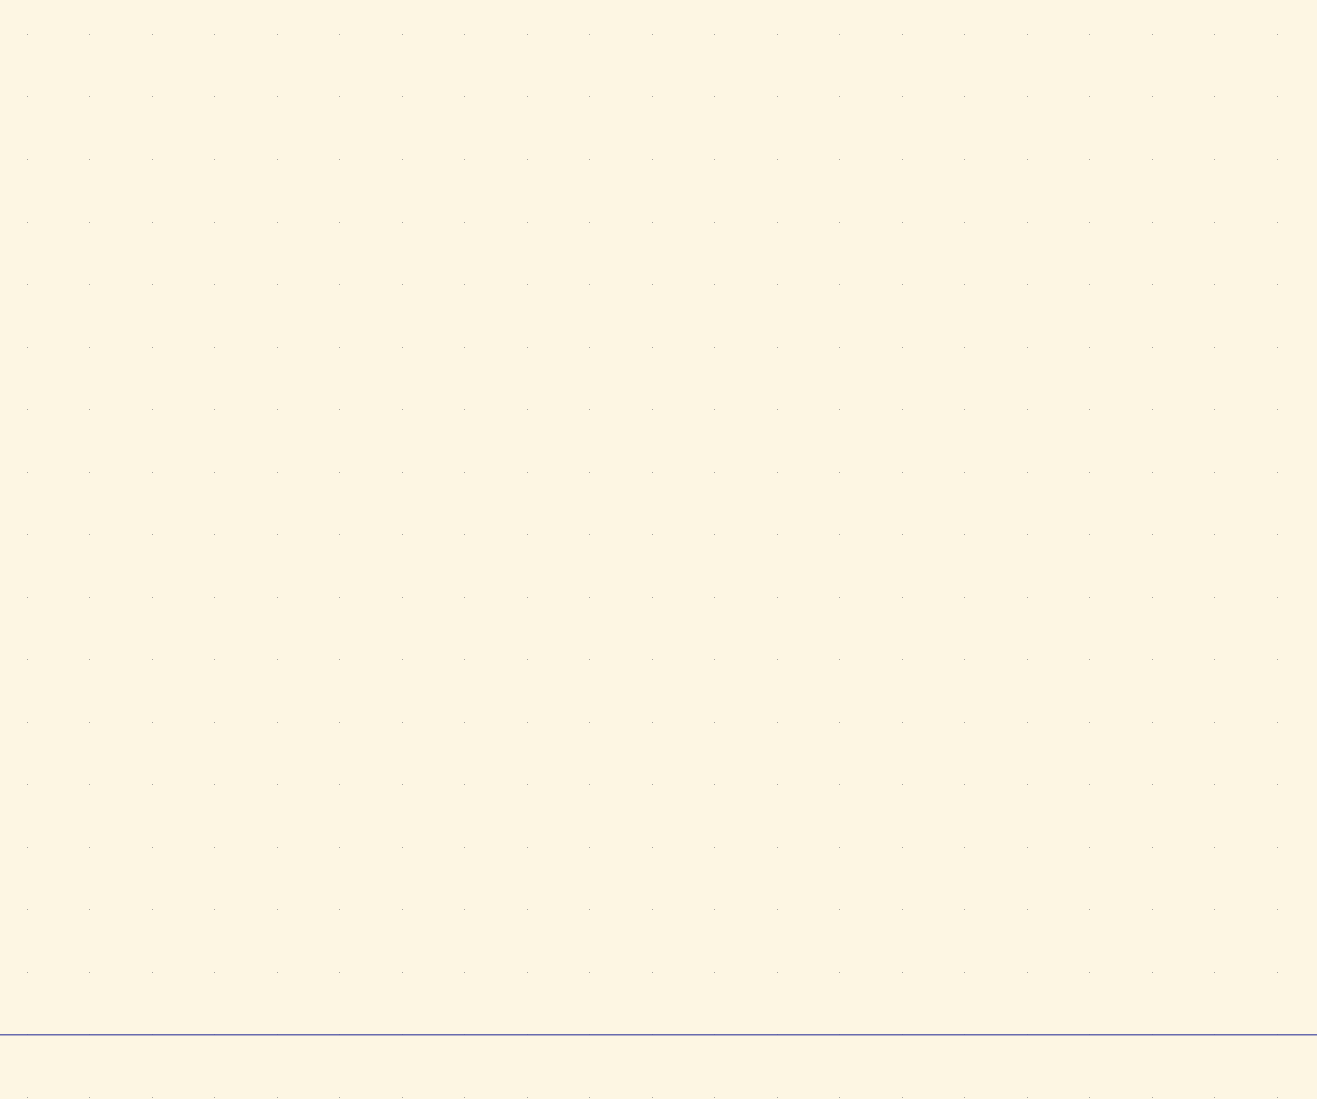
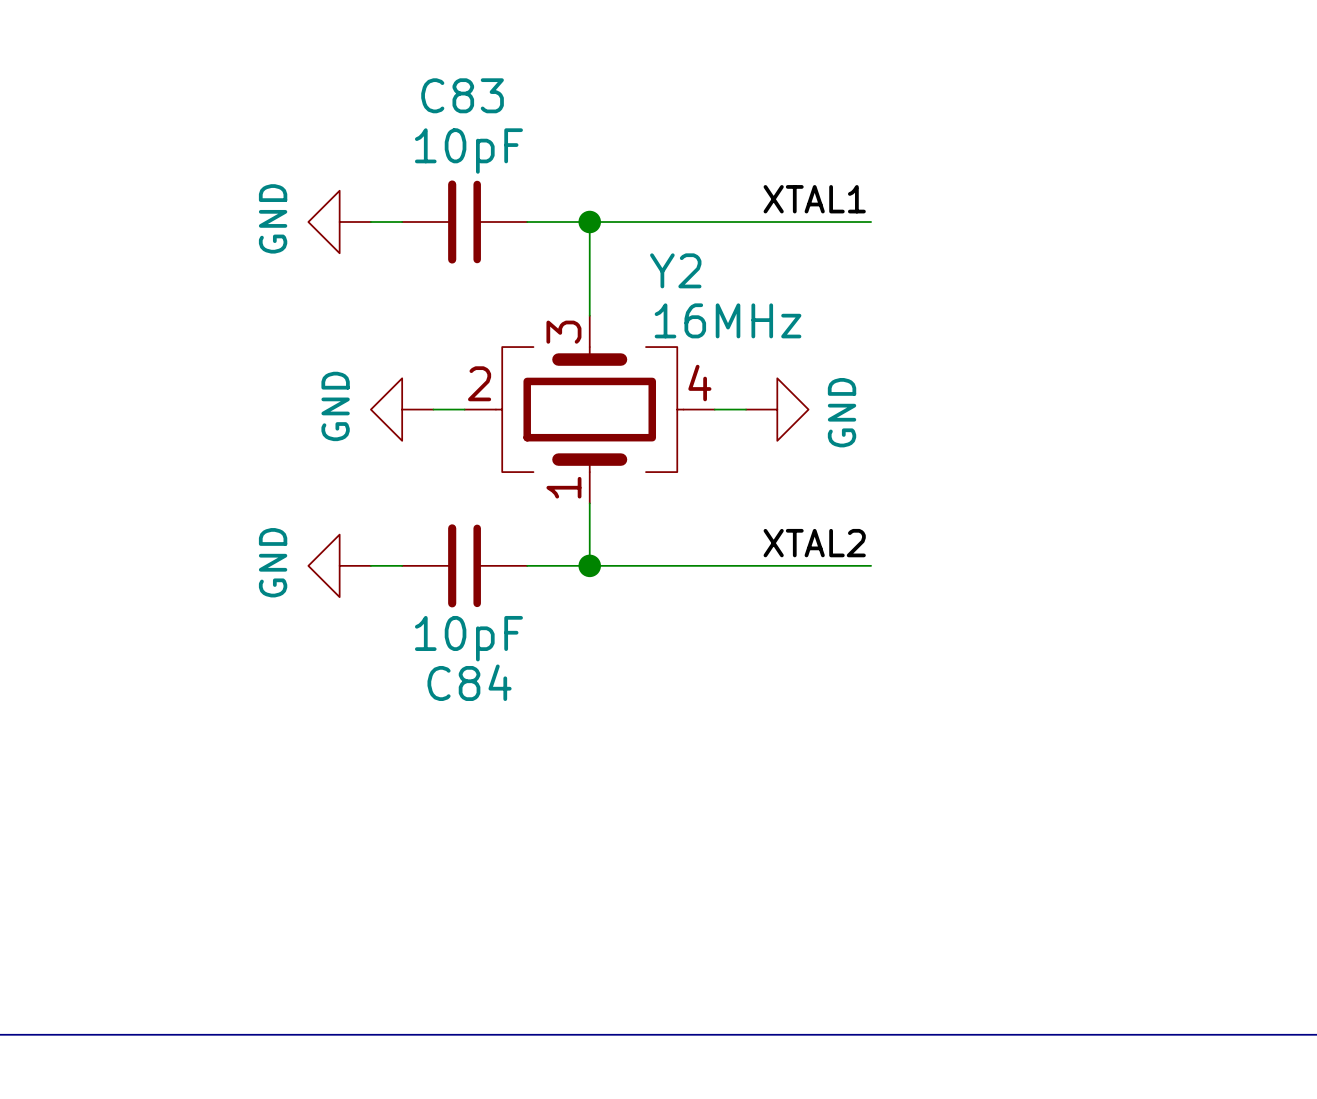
label: none -> XTAL1 (814, 199)
power symbol: none -> GND (339, 222)
wire: none -> (370, 222) (402, 222)
C83: none -> 10pF (464, 222)
wire: none -> (527, 222) (871, 222)
wire: none -> (589, 222) (589, 315)
junction: none -> (589, 222)
power symbol: none -> GND (402, 409)
wire: none -> (433, 409) (464, 409)
Y2: none -> 16MHz (589, 409)
wire: none -> (714, 409) (746, 409)
power symbol: none -> GND (777, 409)
wire: none -> (589, 503) (589, 565)
label: none -> XTAL2 (814, 543)
power symbol: none -> GND (339, 565)
wire: none -> (370, 565) (402, 565)
C84: none -> 10pF (464, 565)
wire: none -> (527, 565) (871, 565)
junction: none -> (589, 565)

